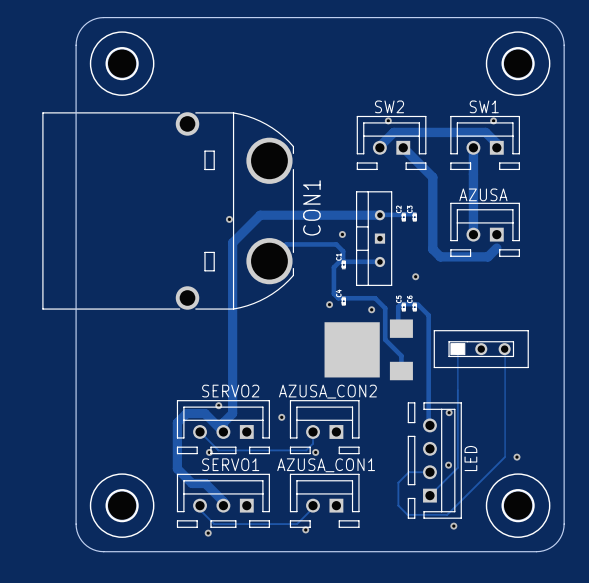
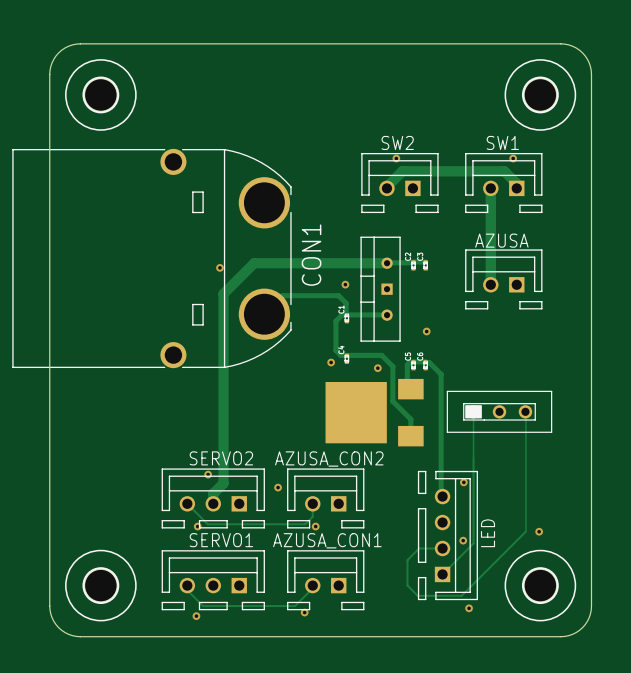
track: (403, 147) (432, 177) (432, 249) (440, 256) (488, 256) (496, 248) -> none
track: (223, 431) (205, 413) (186, 413) (177, 422) (177, 468) (192, 483) (205, 483) (223, 501) (223, 505) -> none

